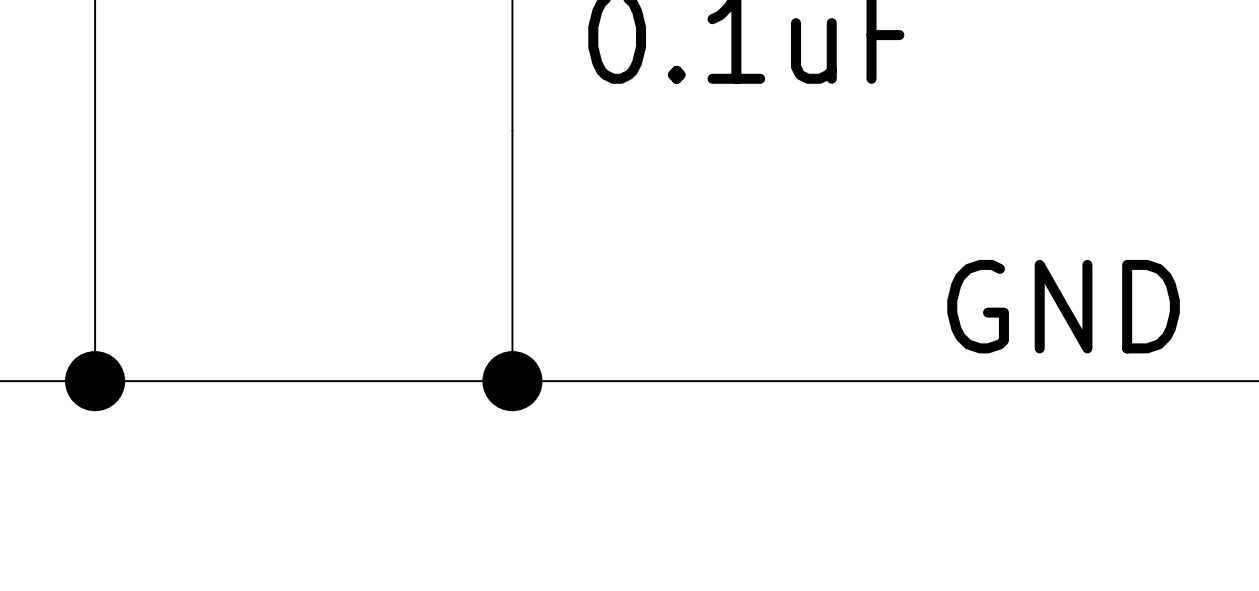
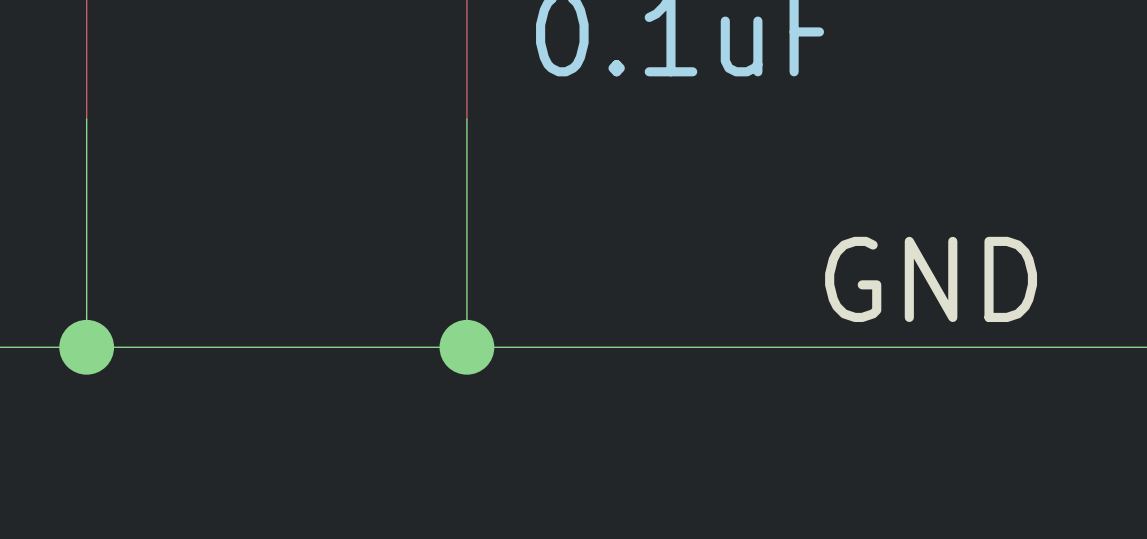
label position: GND (1063, 306) -> GND (931, 279)

